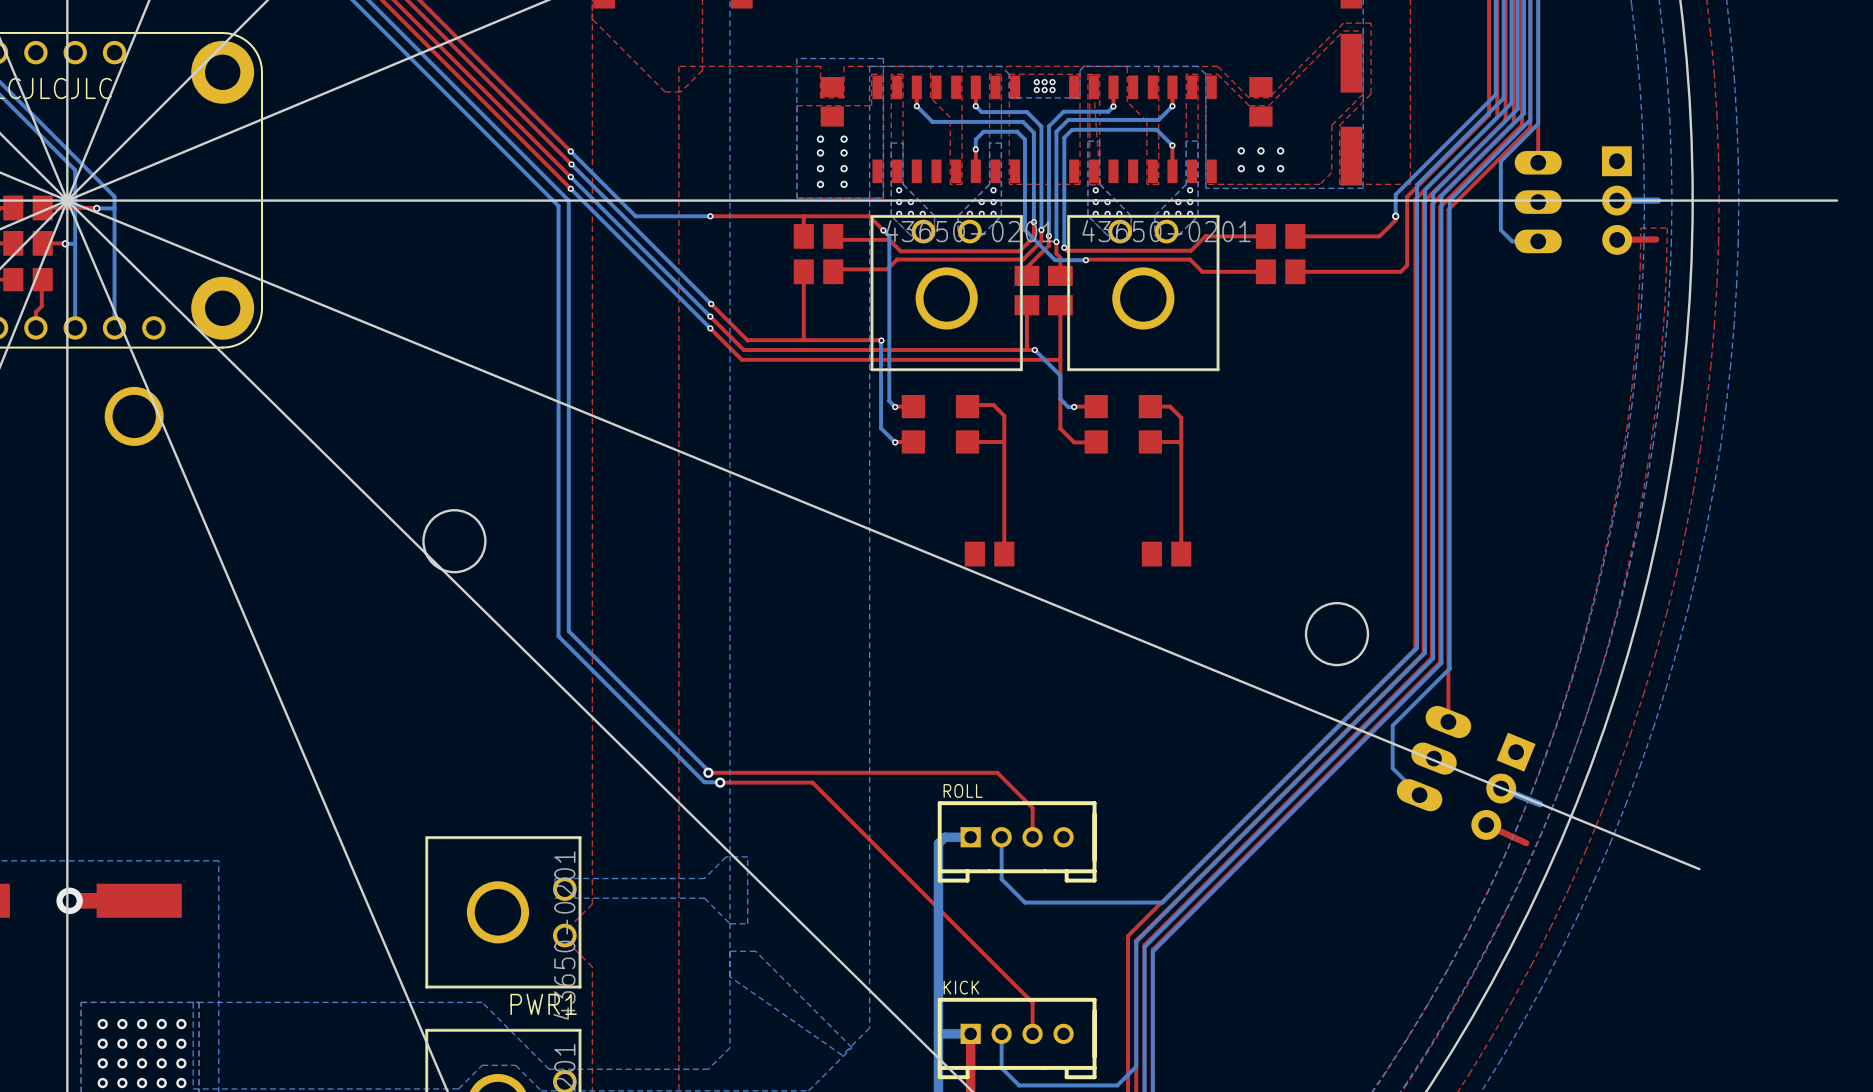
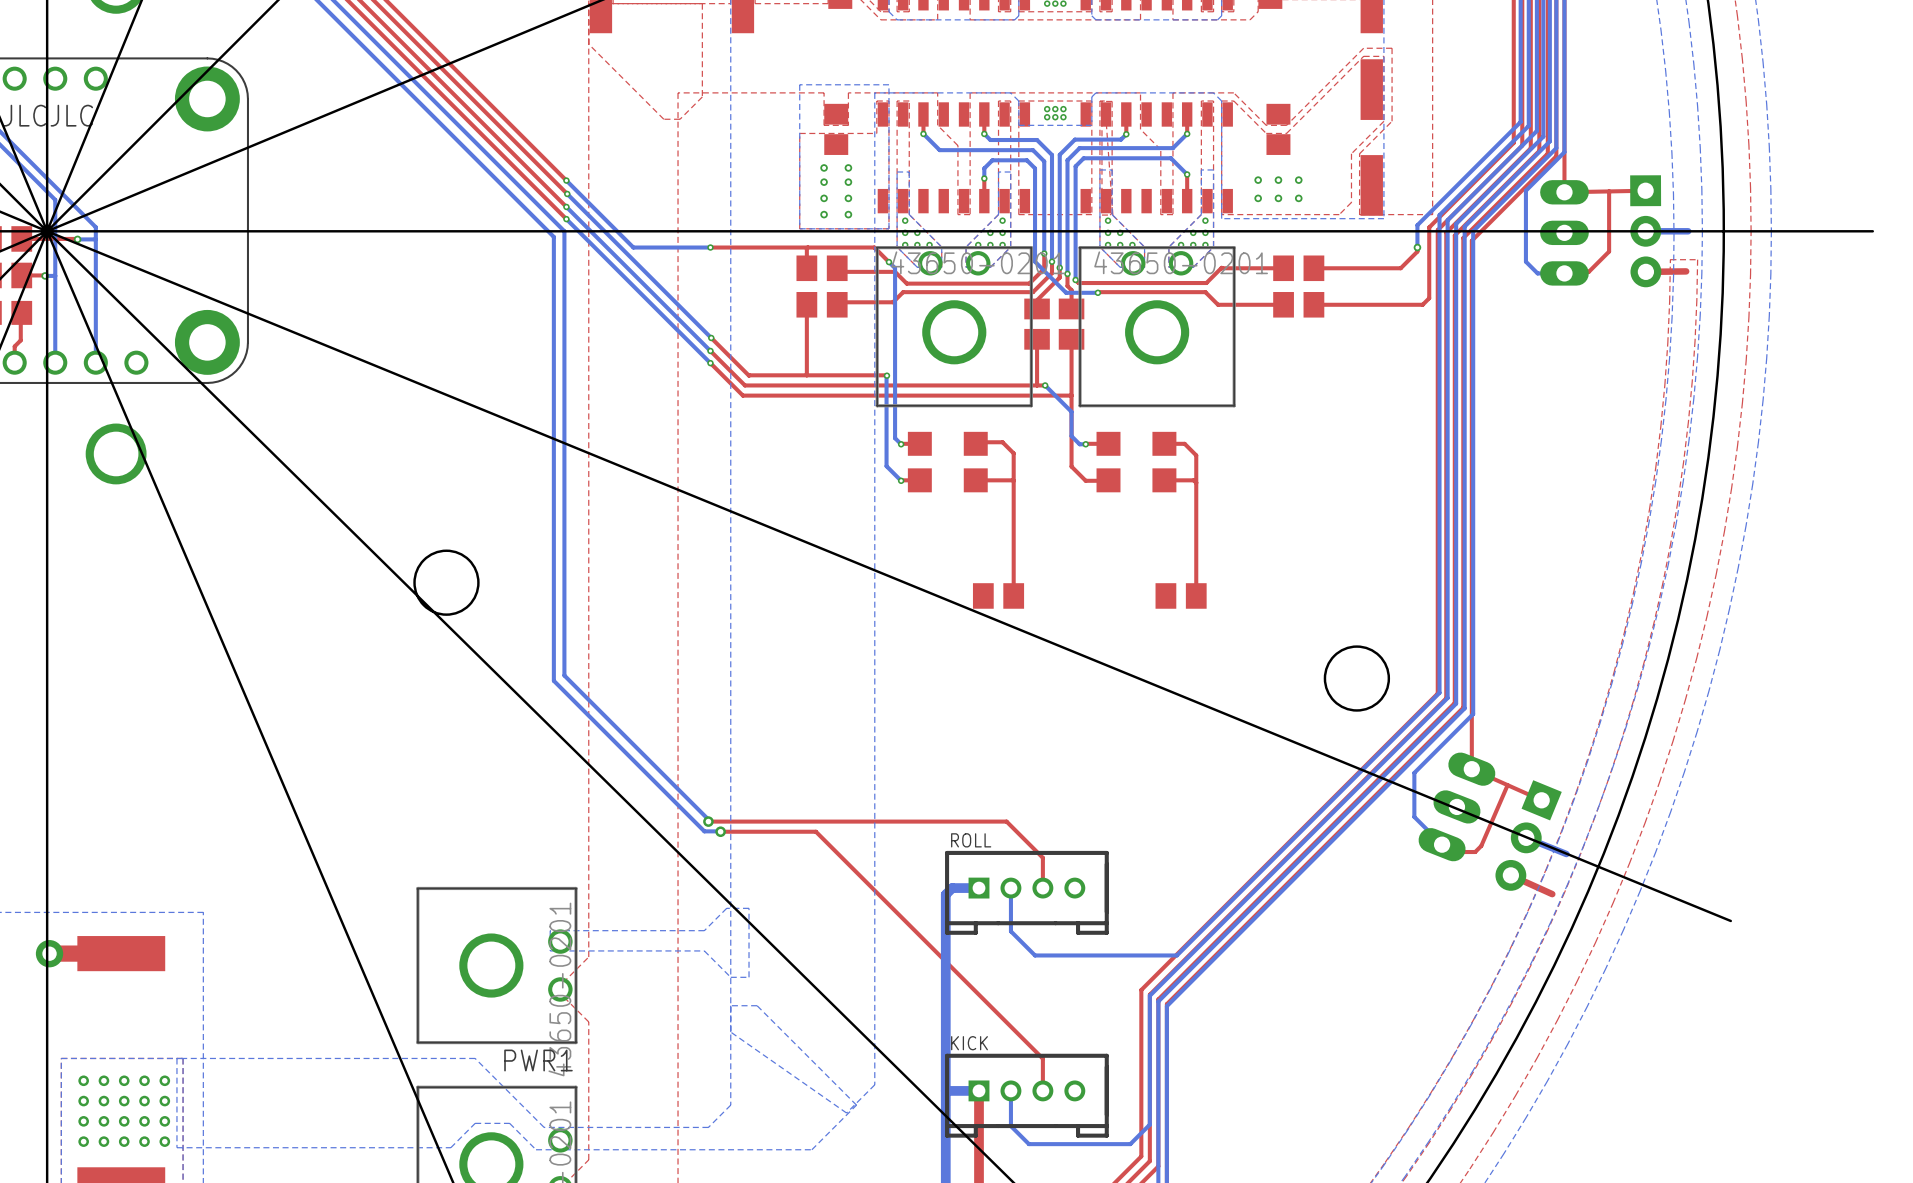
top track: none -> (1609, 191) (1609, 251) (1588, 271) (1564, 273)
top track: none -> (1645, 190) (1564, 192)
top track: none -> (1471, 769) (1541, 800)
top track: none -> (1507, 785) (1481, 845) (1475, 852) (1461, 852) (1442, 844)

